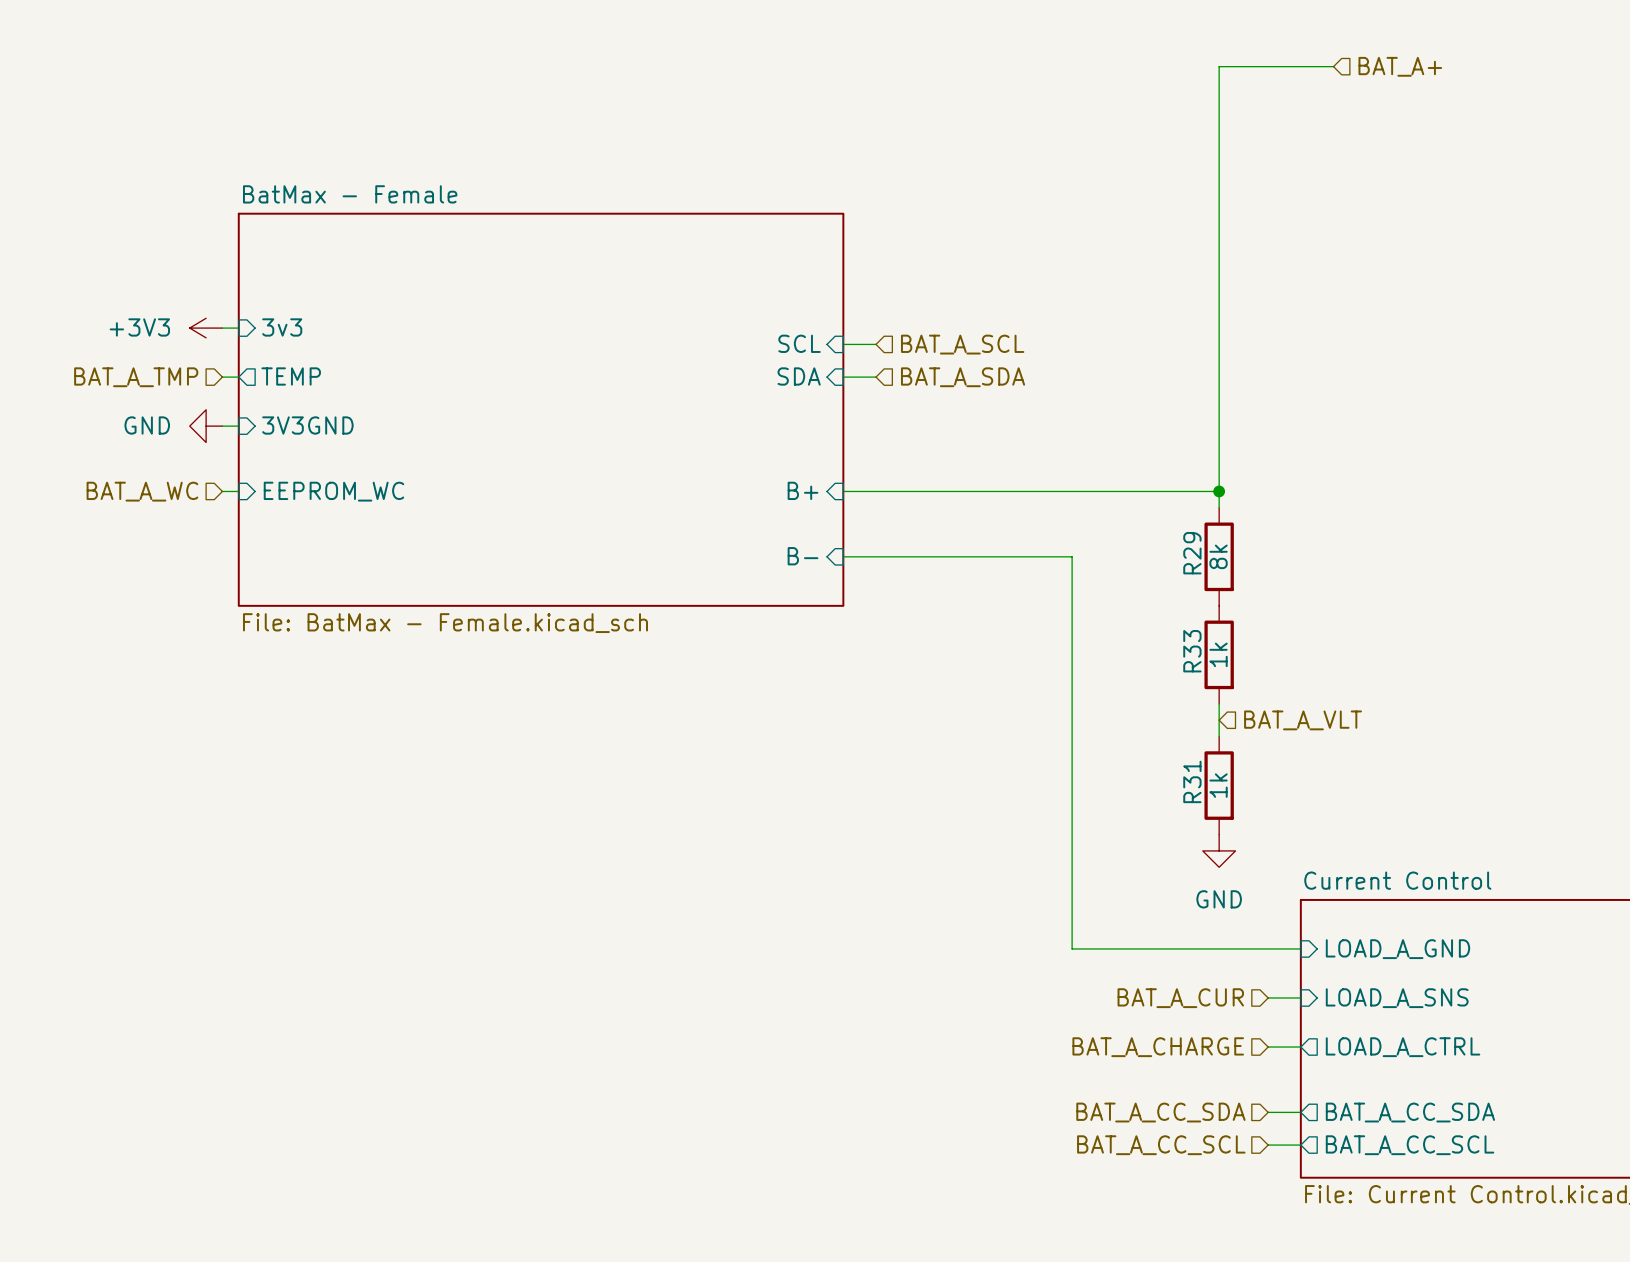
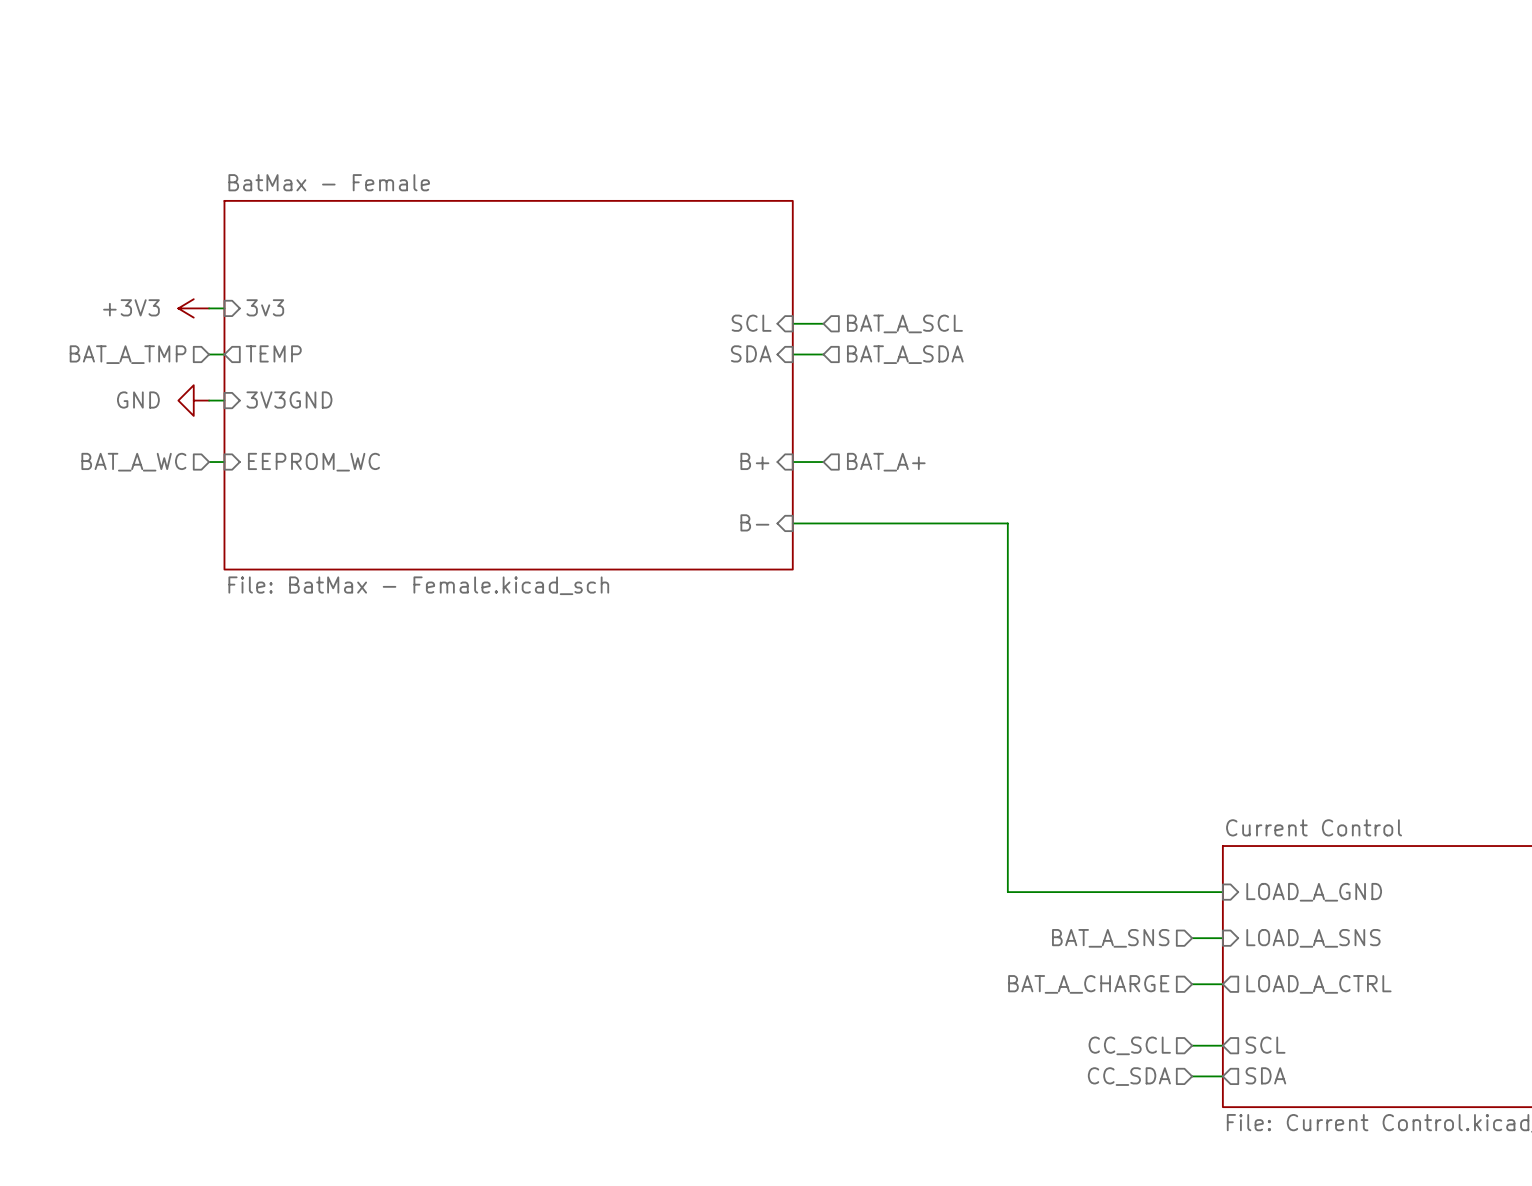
wire: (1333, 66) (1219, 66) (1219, 507) -> none
hierarchical label: BAT_A+ (1400, 66) -> none
wire: (876, 491) (1219, 491) -> none
hierarchical label: none -> BAT_A+ (886, 462)
junction: (1219, 491) -> none
R29: 8k (1219, 556) -> none
R33: 1k (1219, 654) -> none
wire: (1219, 703) (1219, 736) -> none
hierarchical label: BAT_A_VLT (1303, 720) -> none
R31: 1k (1219, 785) -> none
power symbol: GND (1219, 850) -> none
hierarchical label: BAT_A_CUR (1180, 998) -> BAT_A_SNS (1110, 938)
hierarchical label: BAT_A_CC_SDA (1160, 1112) -> CC_SCL (1129, 1045)
sheet pin: BAT_A_CC_SDA (1410, 1112) -> SCL (1265, 1045)
hierarchical label: BAT_A_CC_SCL (1161, 1145) -> CC_SDA (1129, 1076)
sheet pin: BAT_A_CC_SCL (1410, 1145) -> SDA (1265, 1075)

